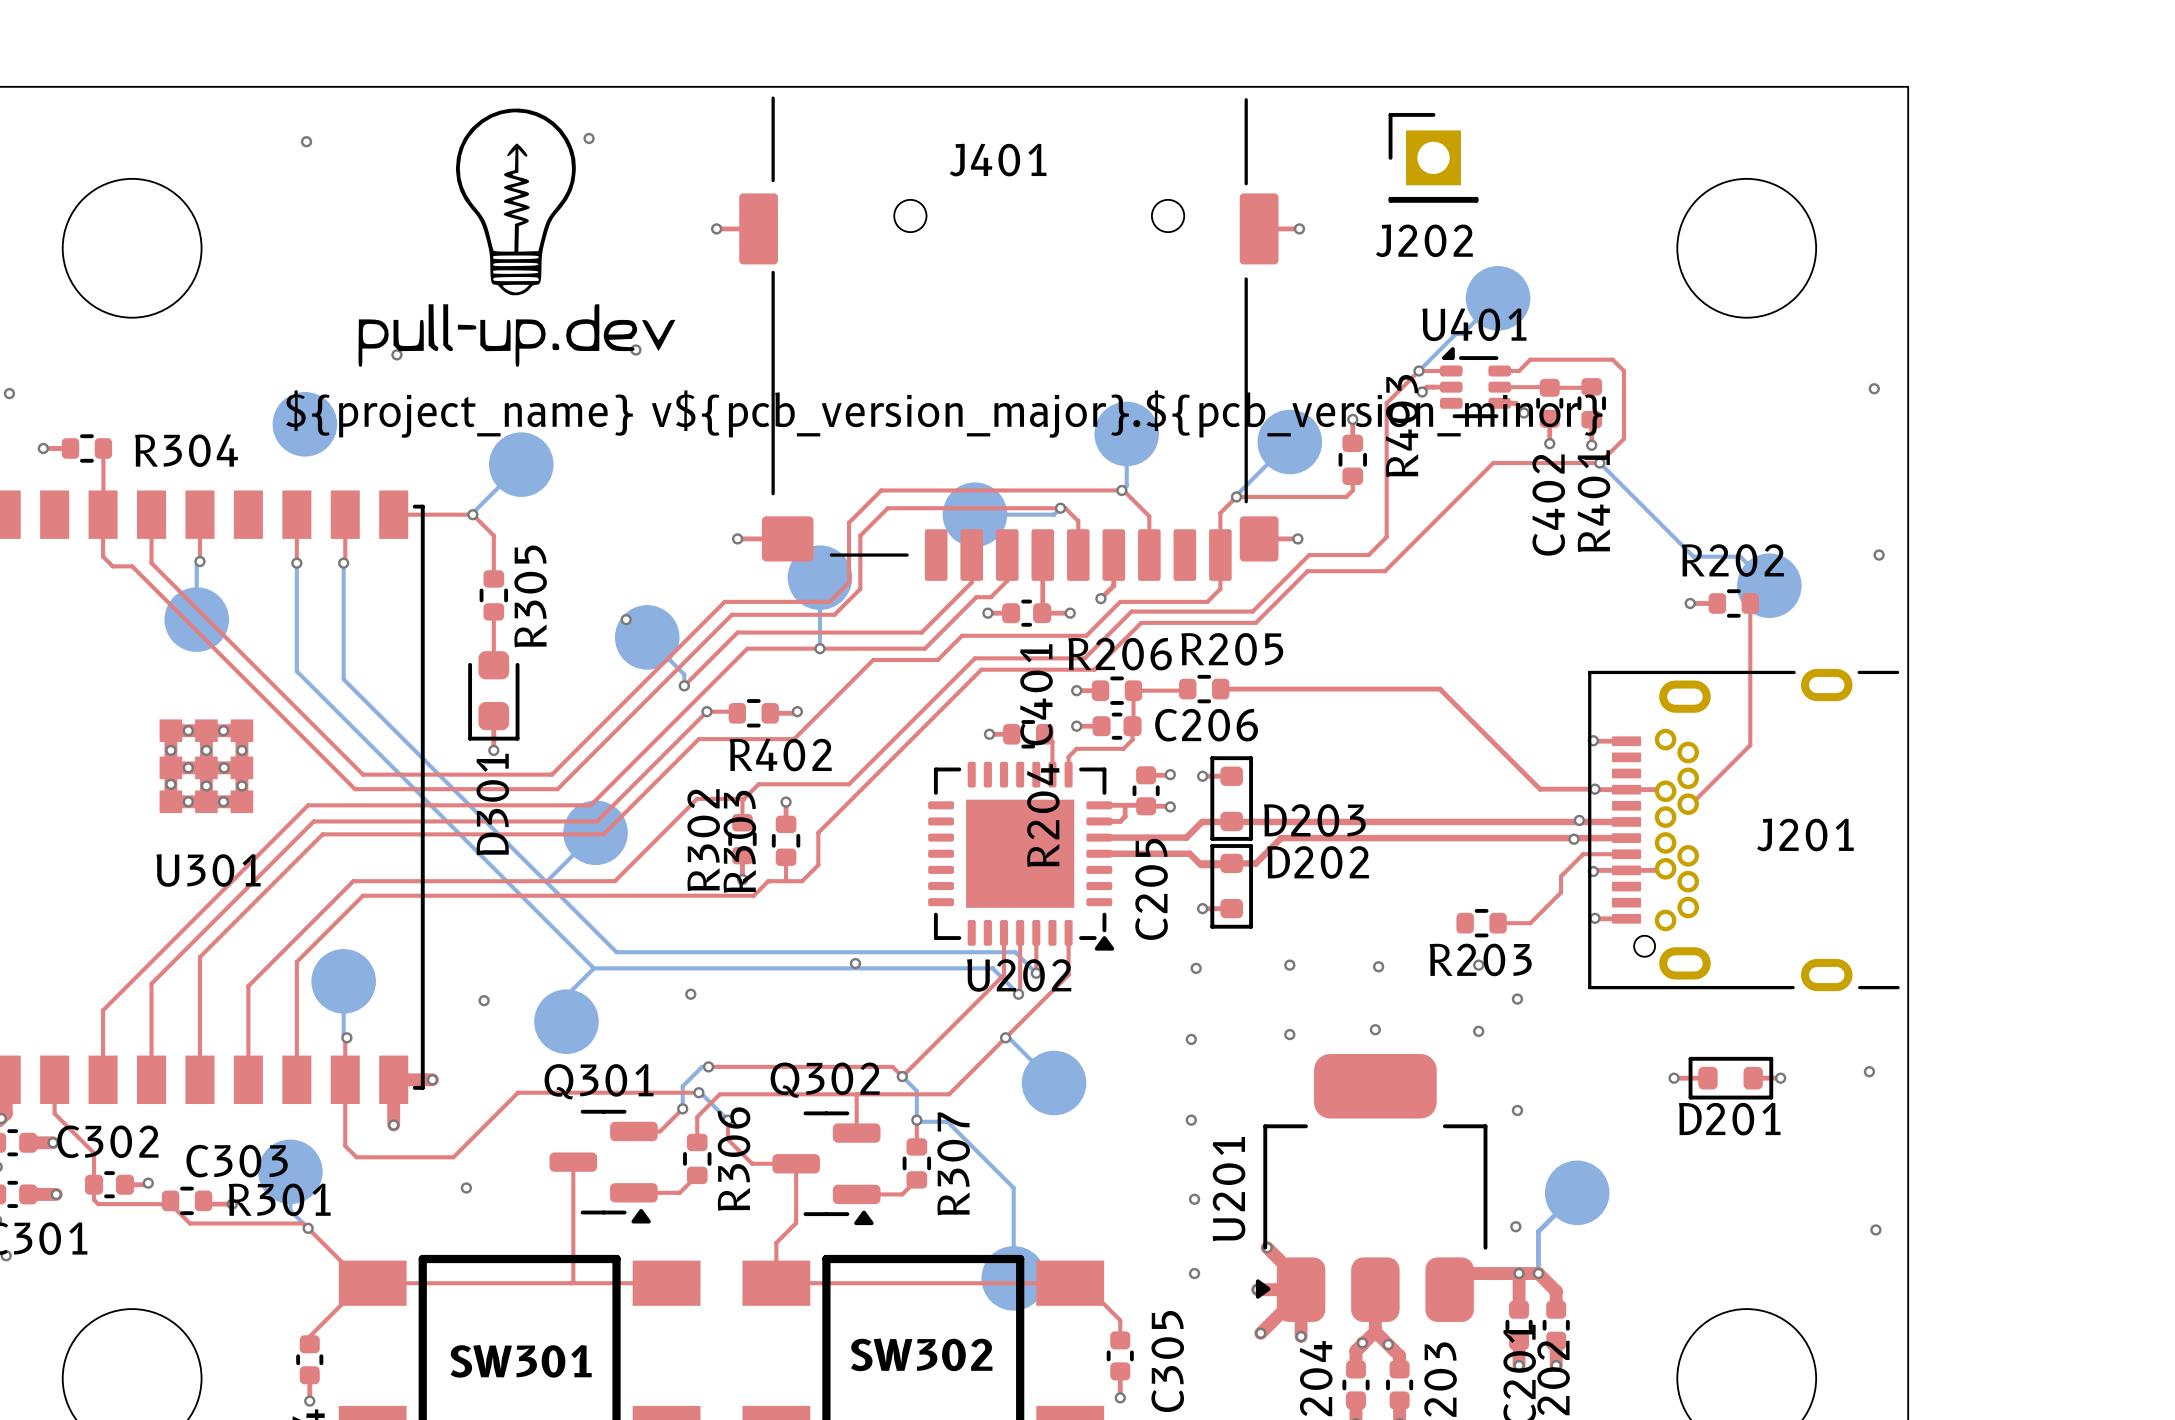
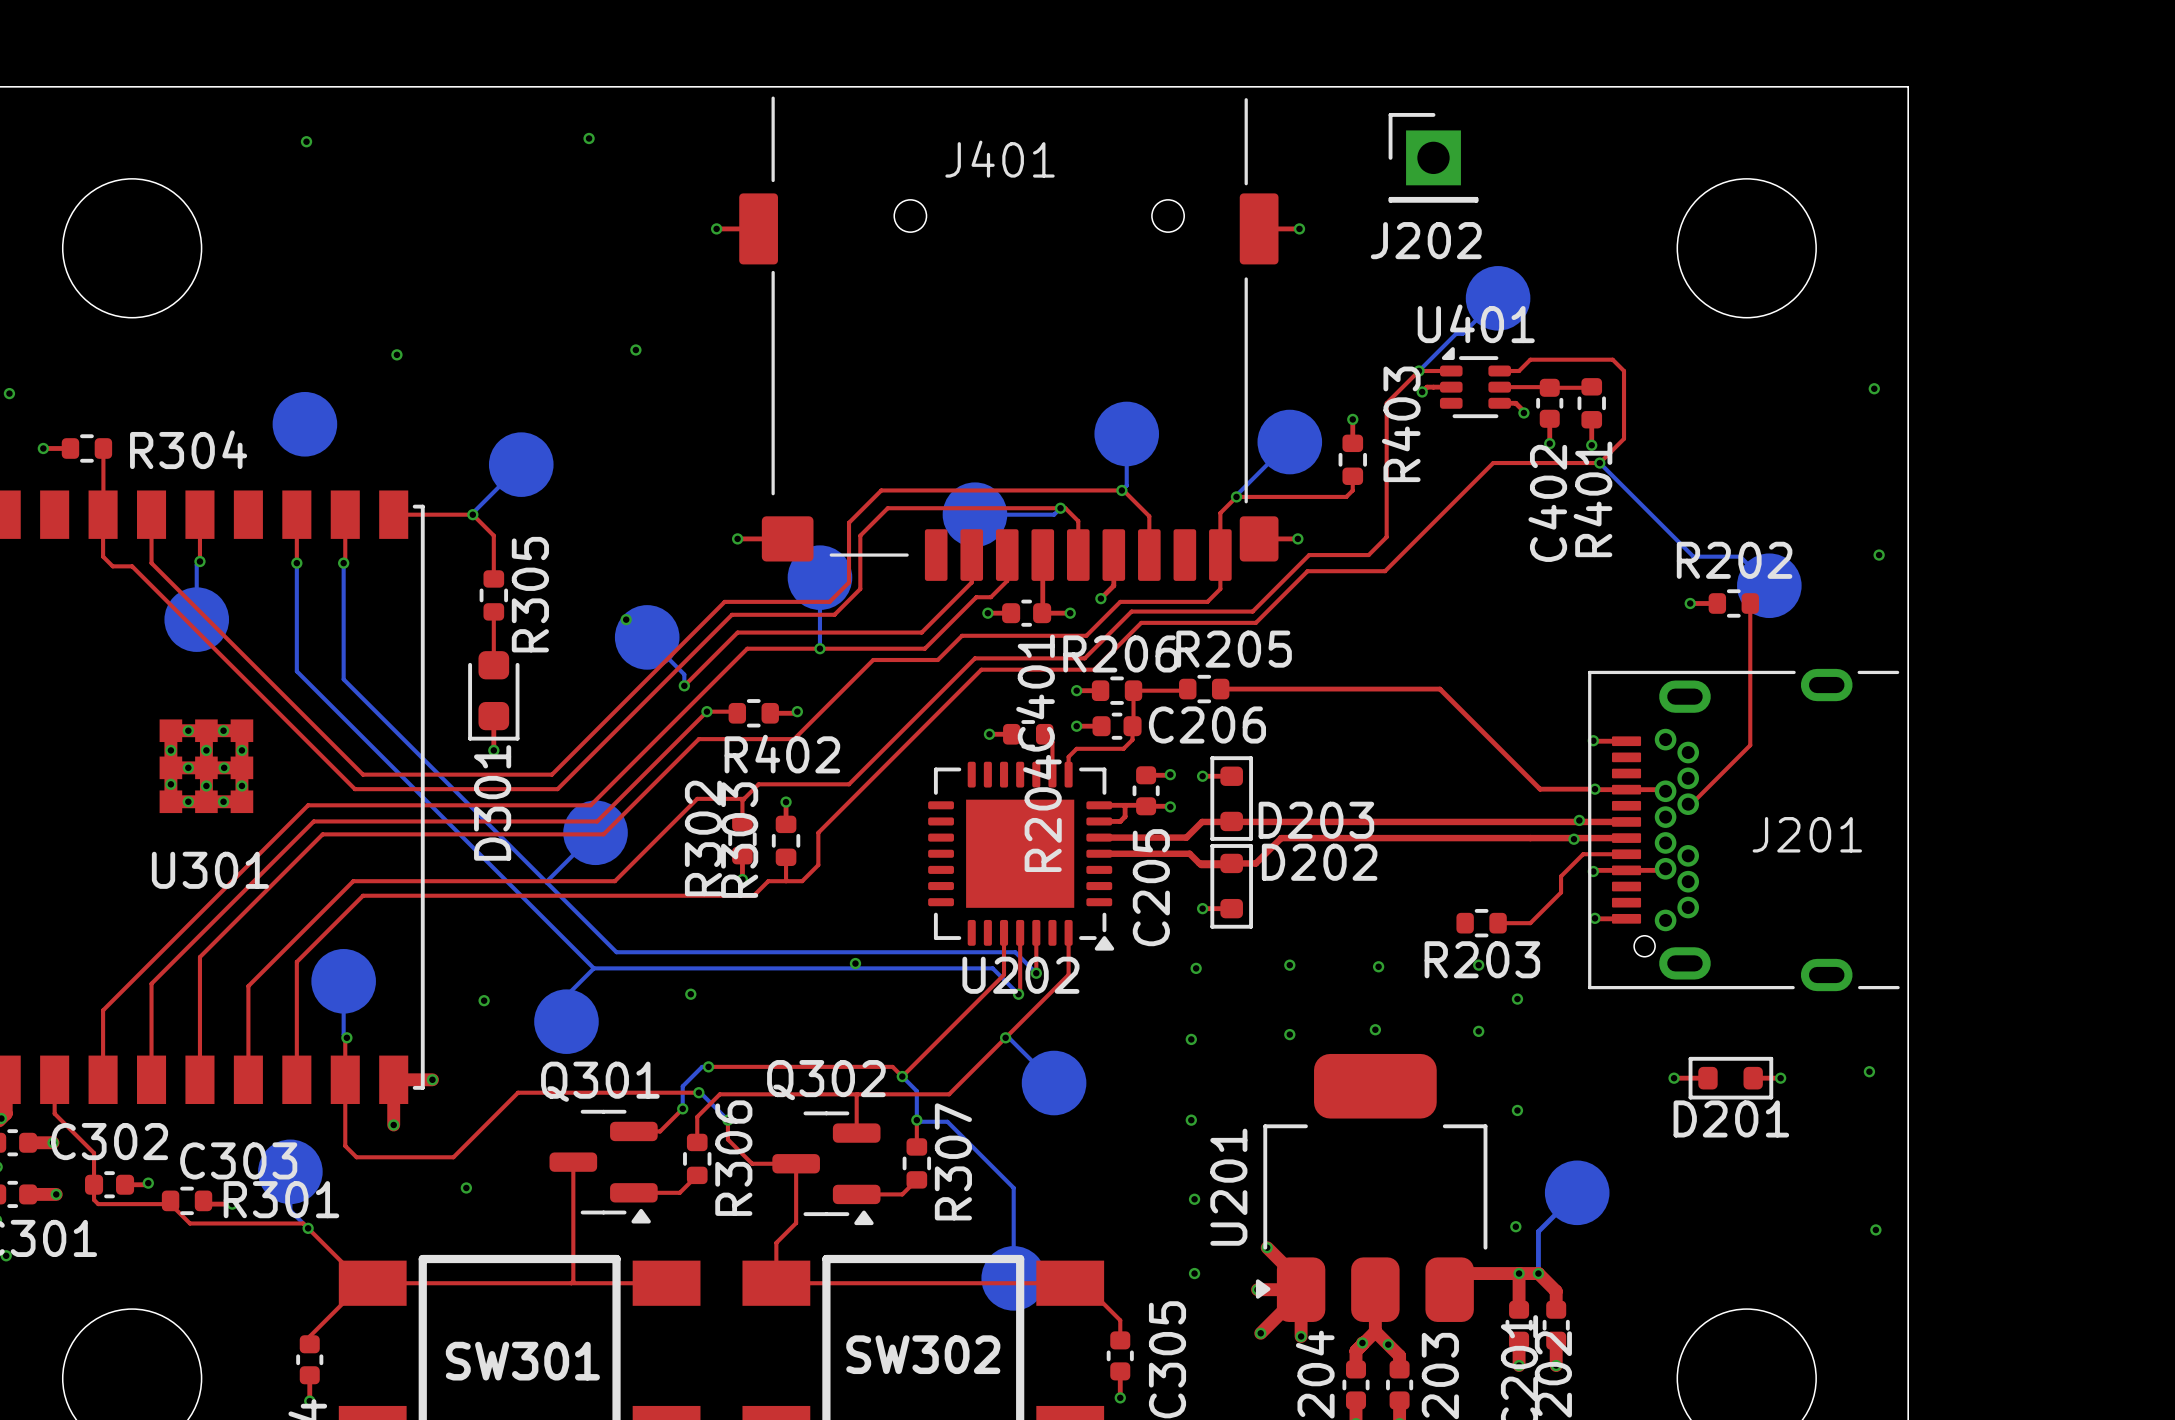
drawing: [358, 108, 676, 367] -> none
text: ${project_name} v${pcb_version_major}.${pcb_version_minor} (944, 414) -> none

